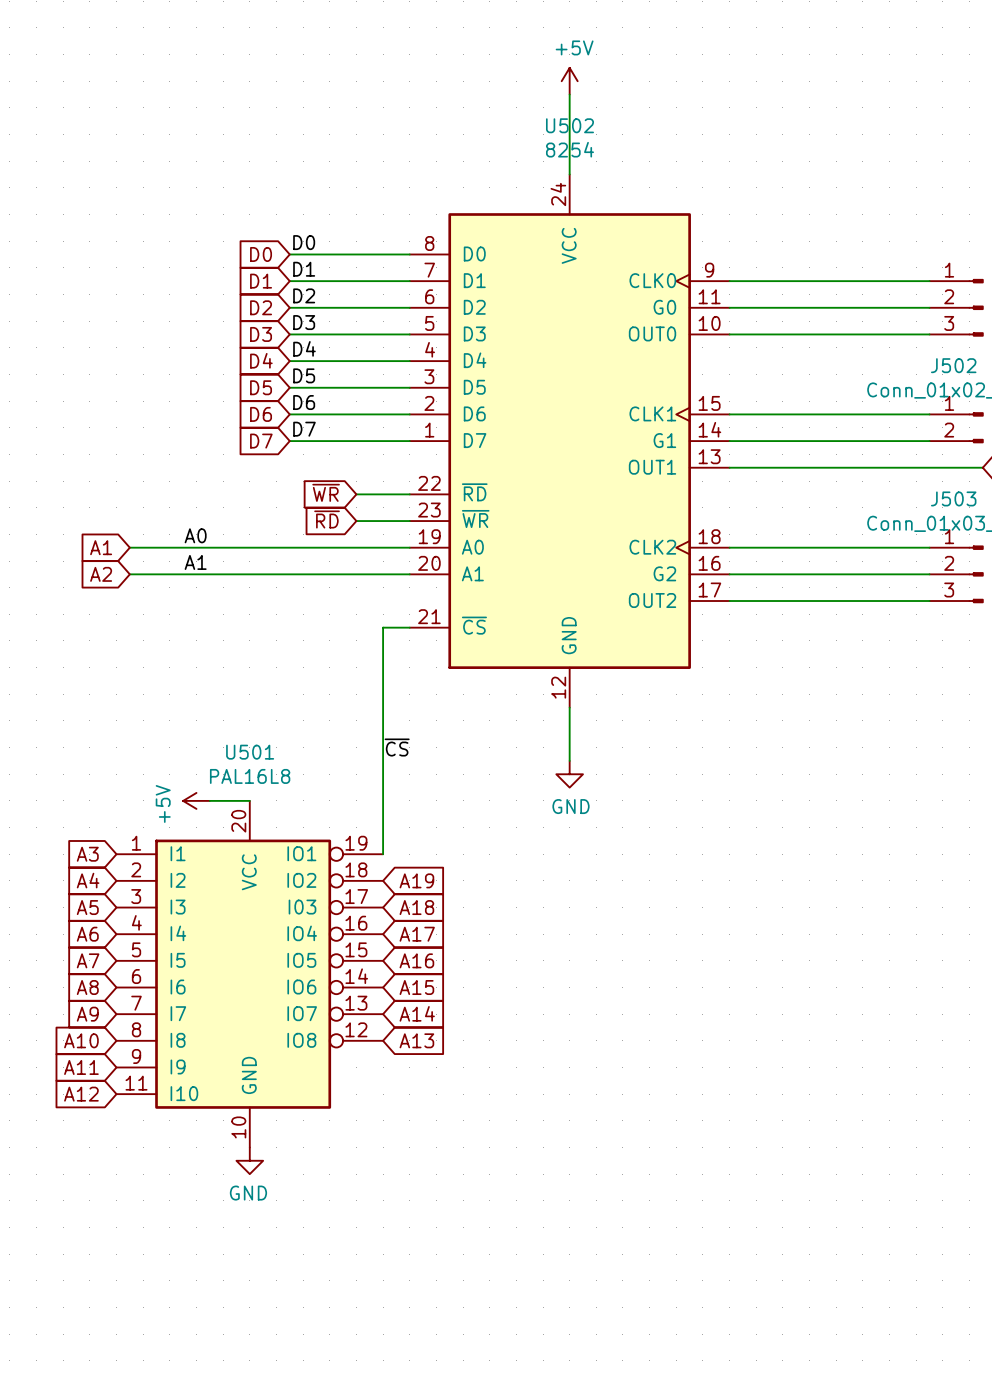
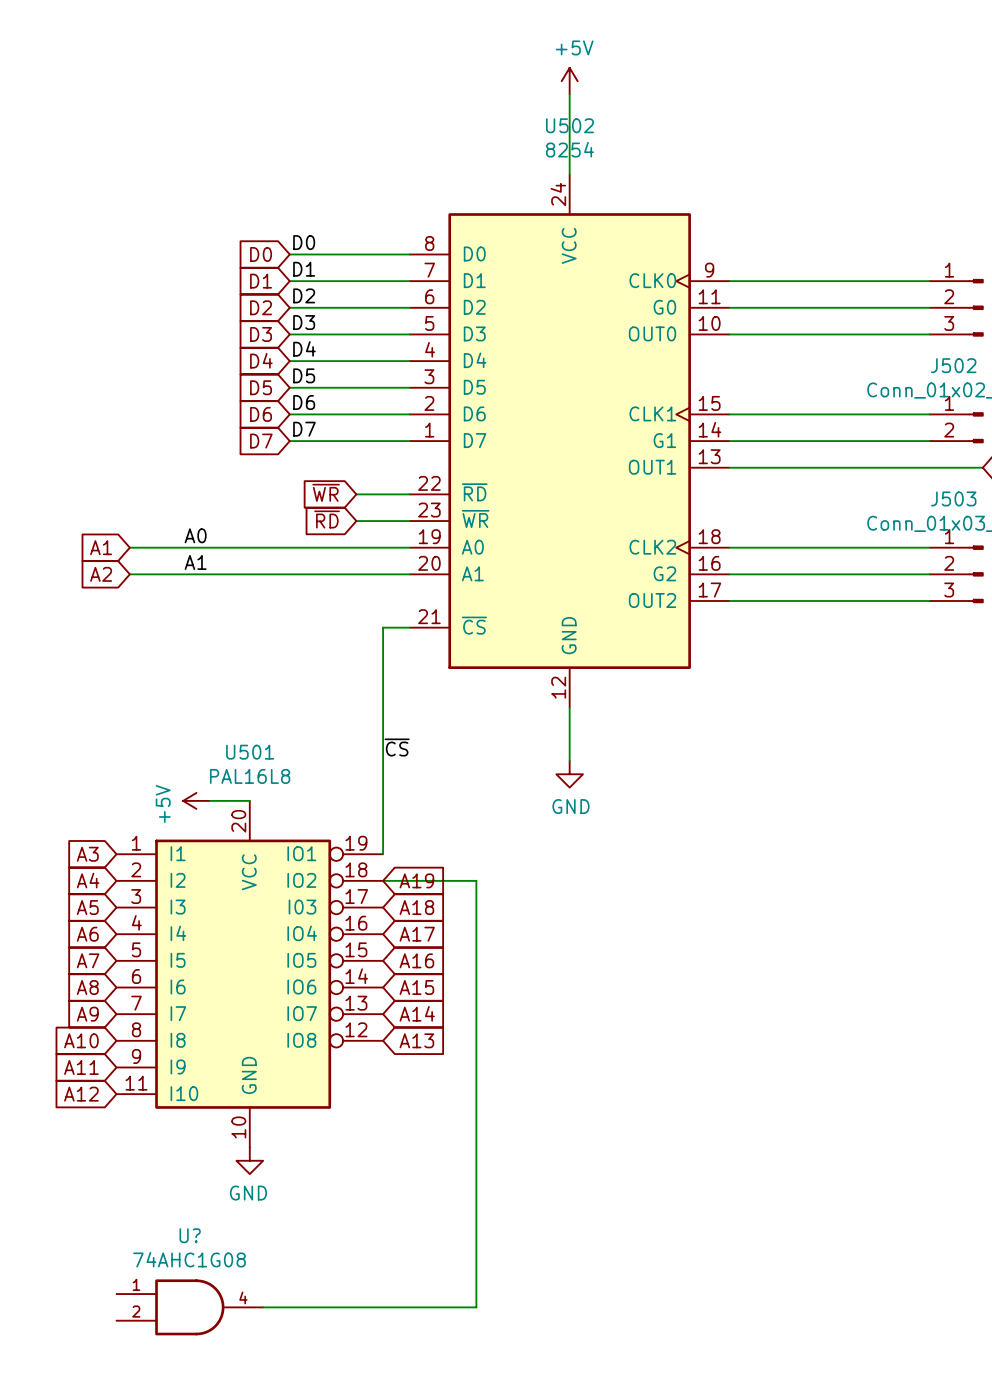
wire: none -> (383, 880) (476, 880) (476, 1307) (263, 1307)
U?: none -> 74AHC1G08 (189, 1307)

